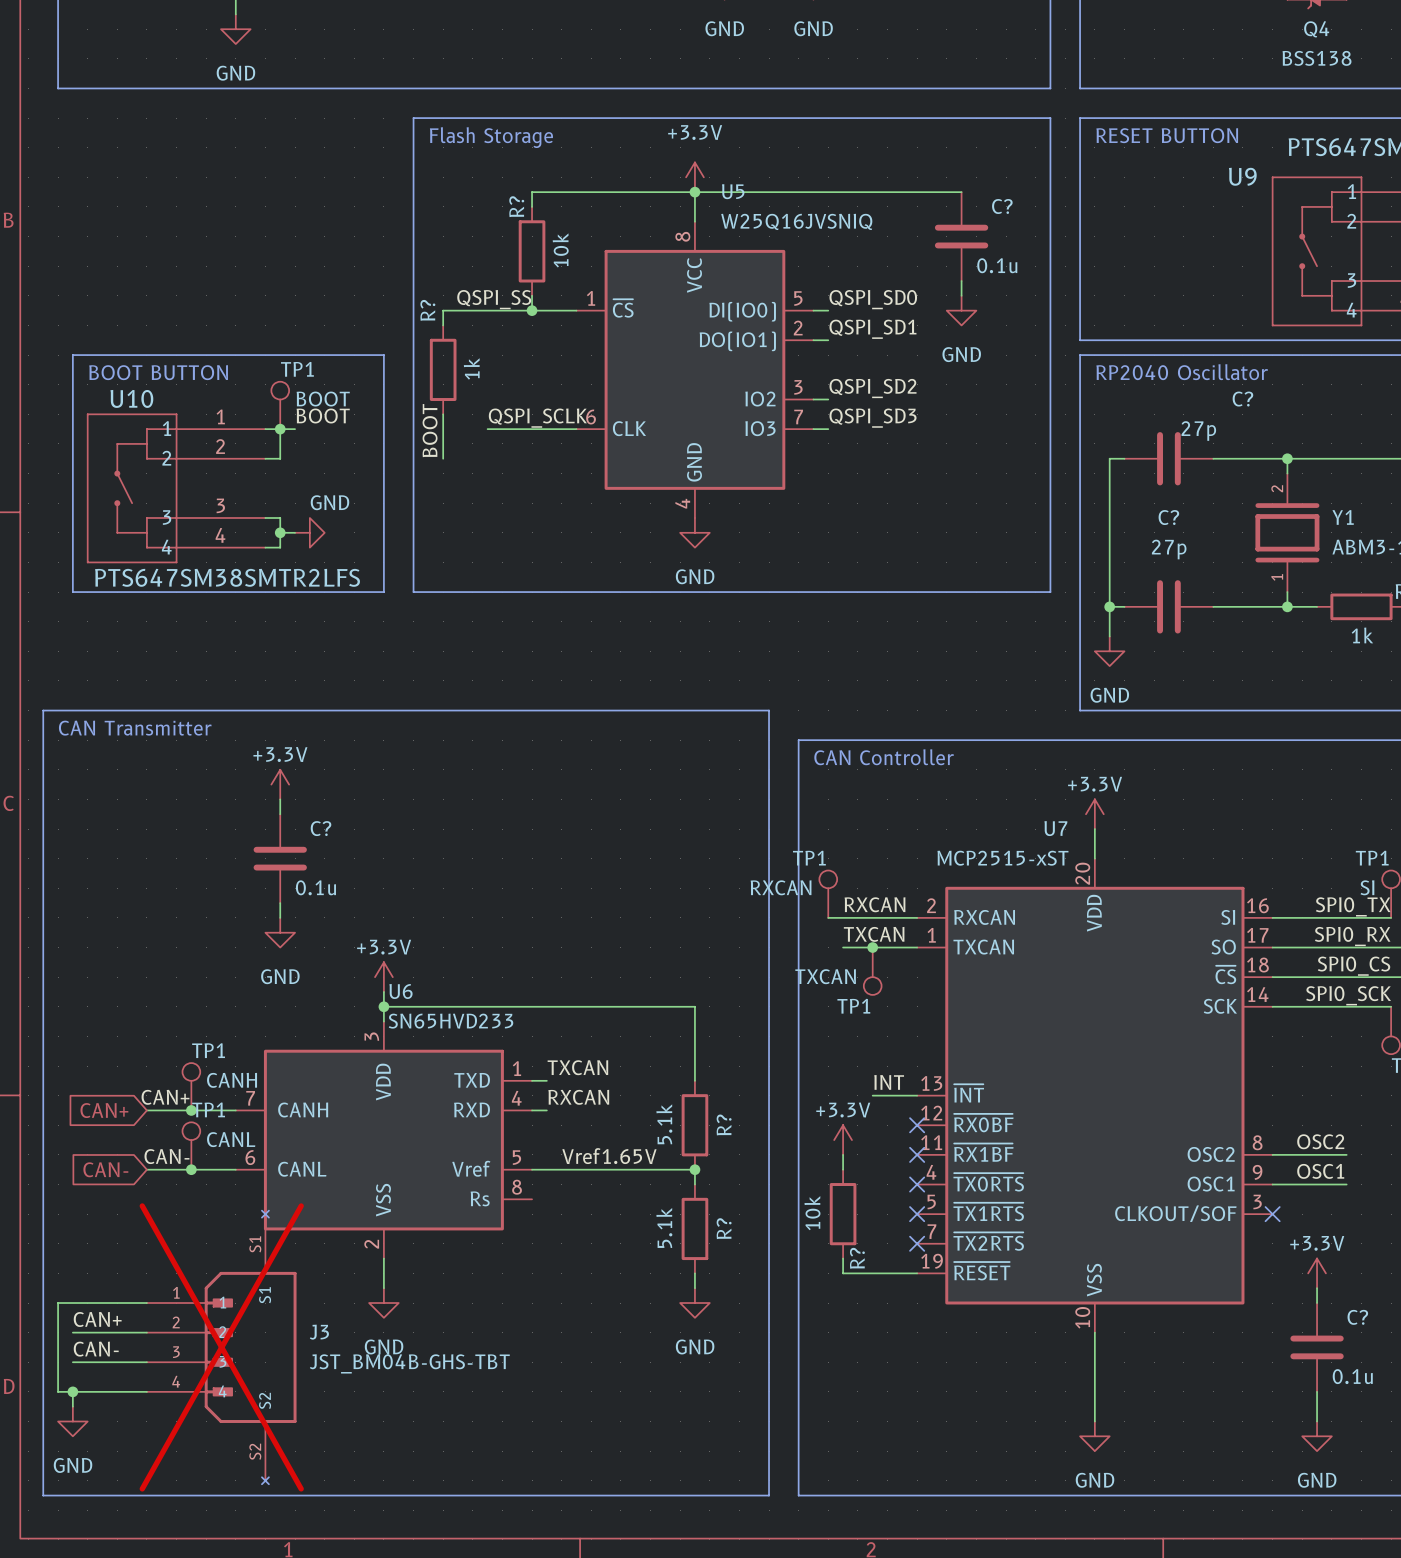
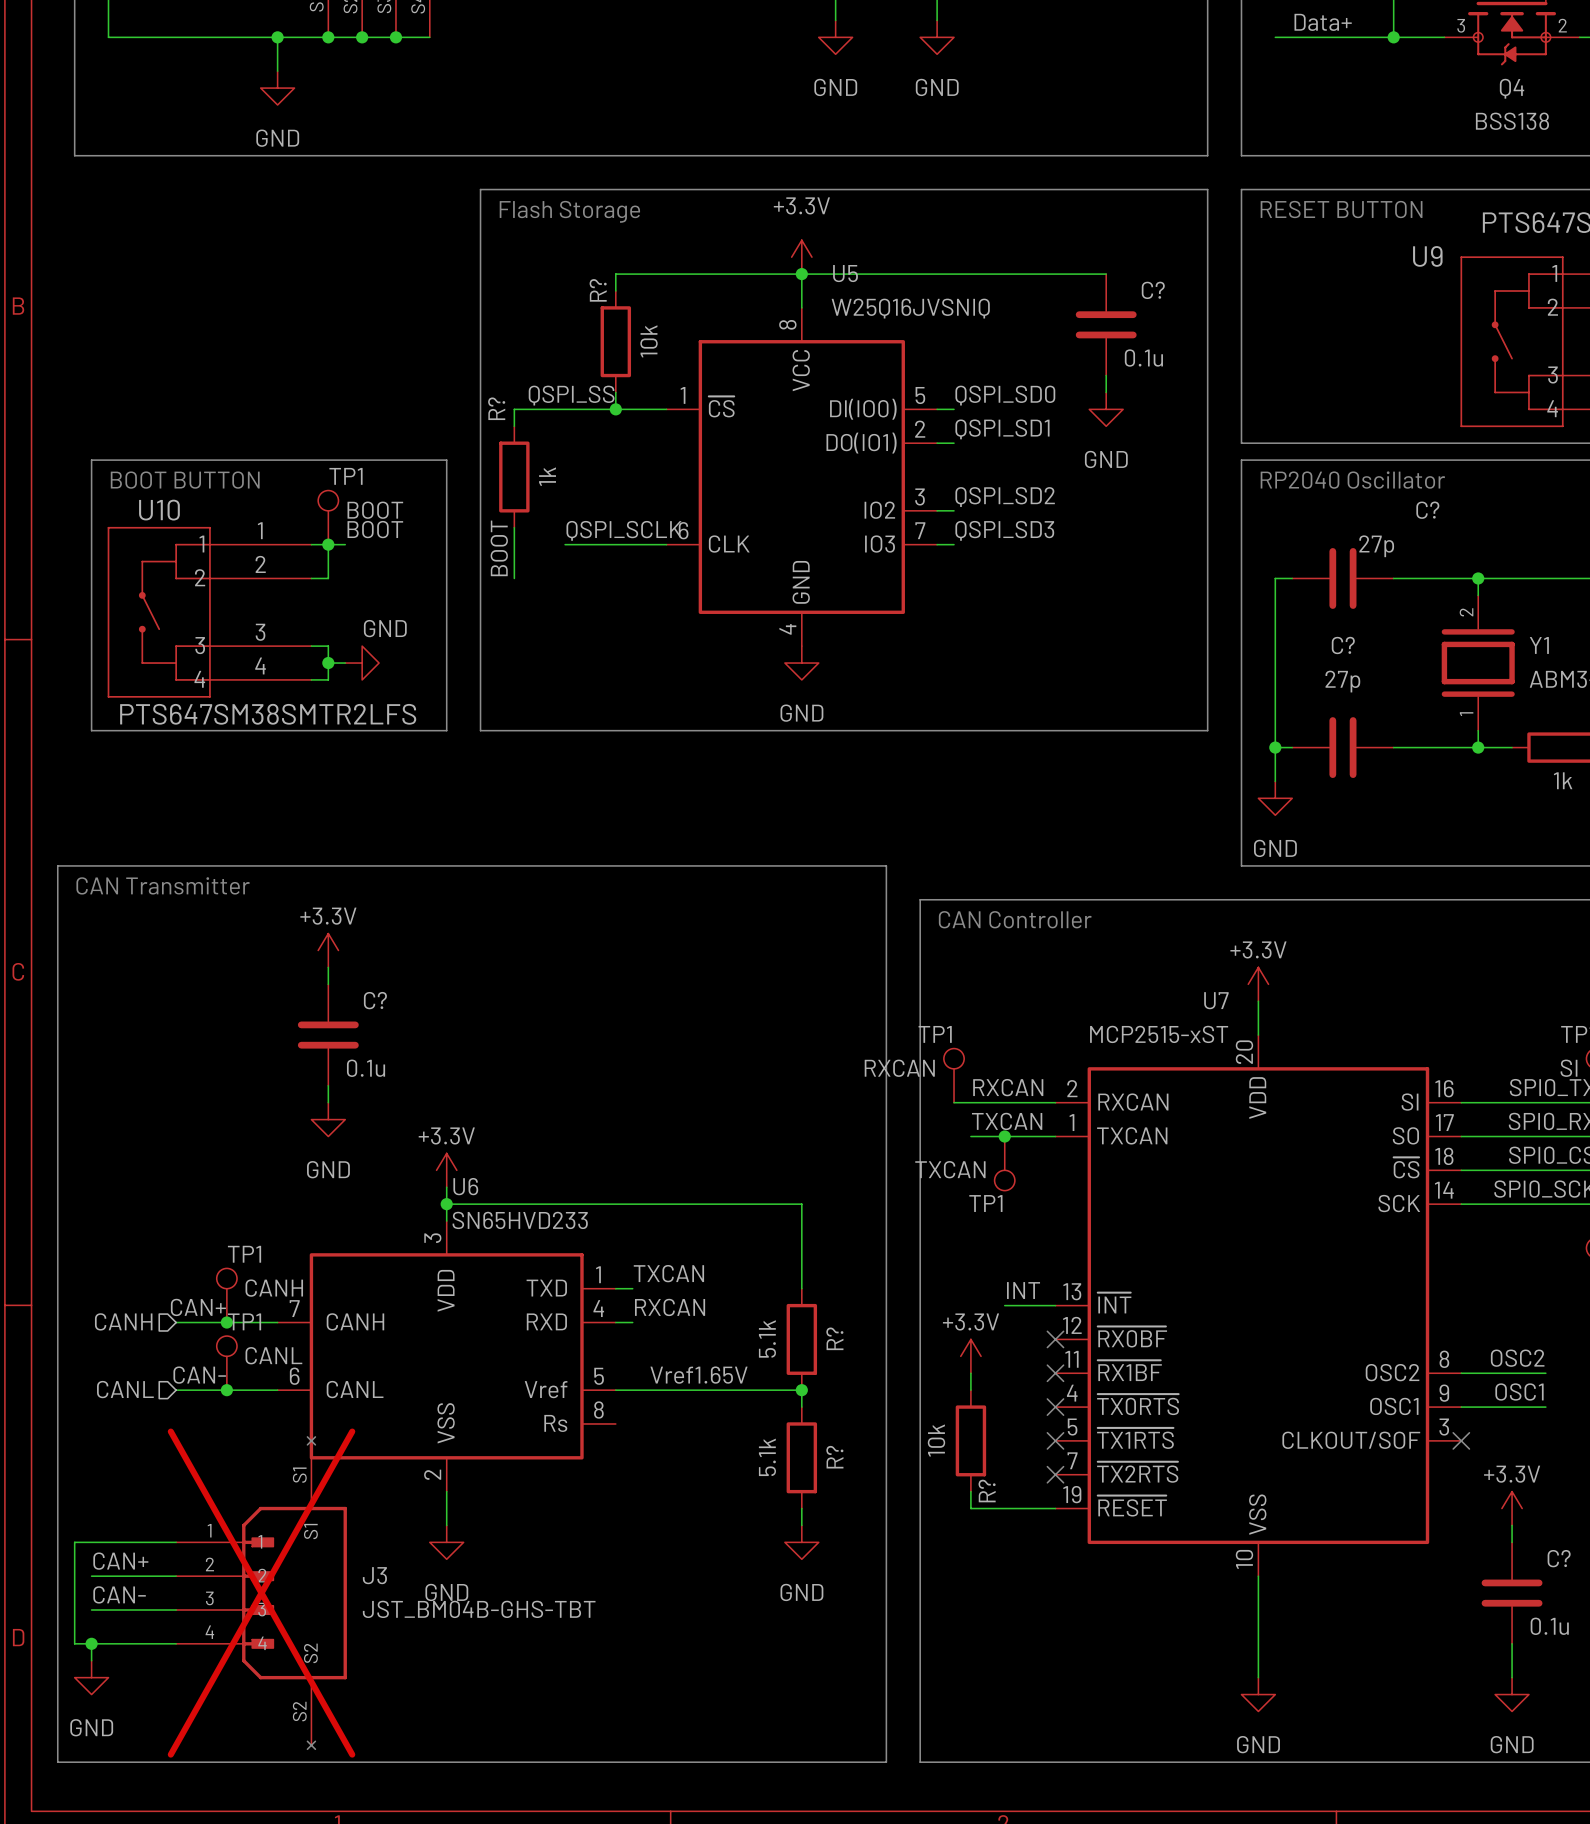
hierarchical label: none -> CANH (123, 1321)
global label: CAN+ (104, 1110) -> none
hierarchical label: none -> CANL (125, 1389)
global label: CAN- (105, 1169) -> none

